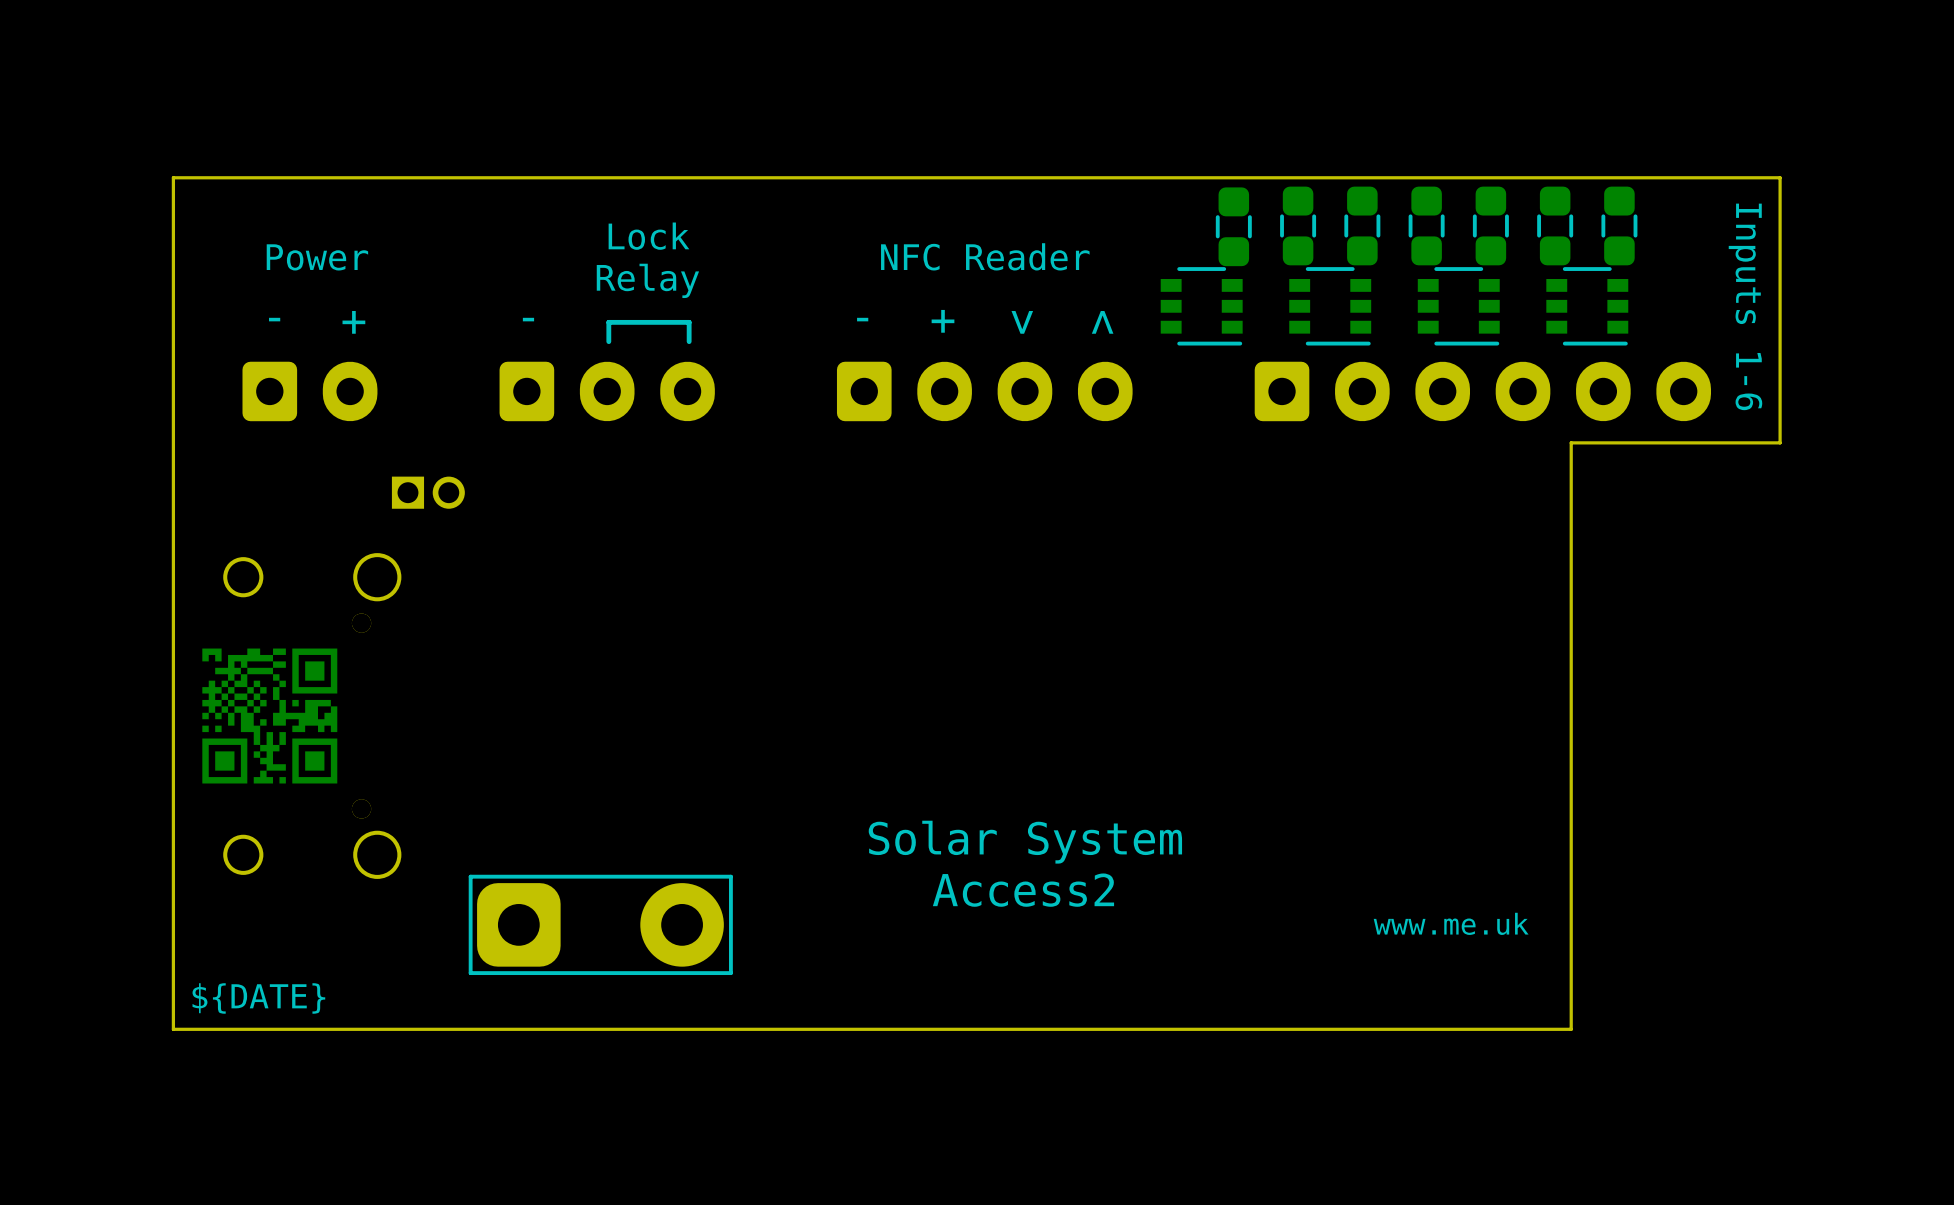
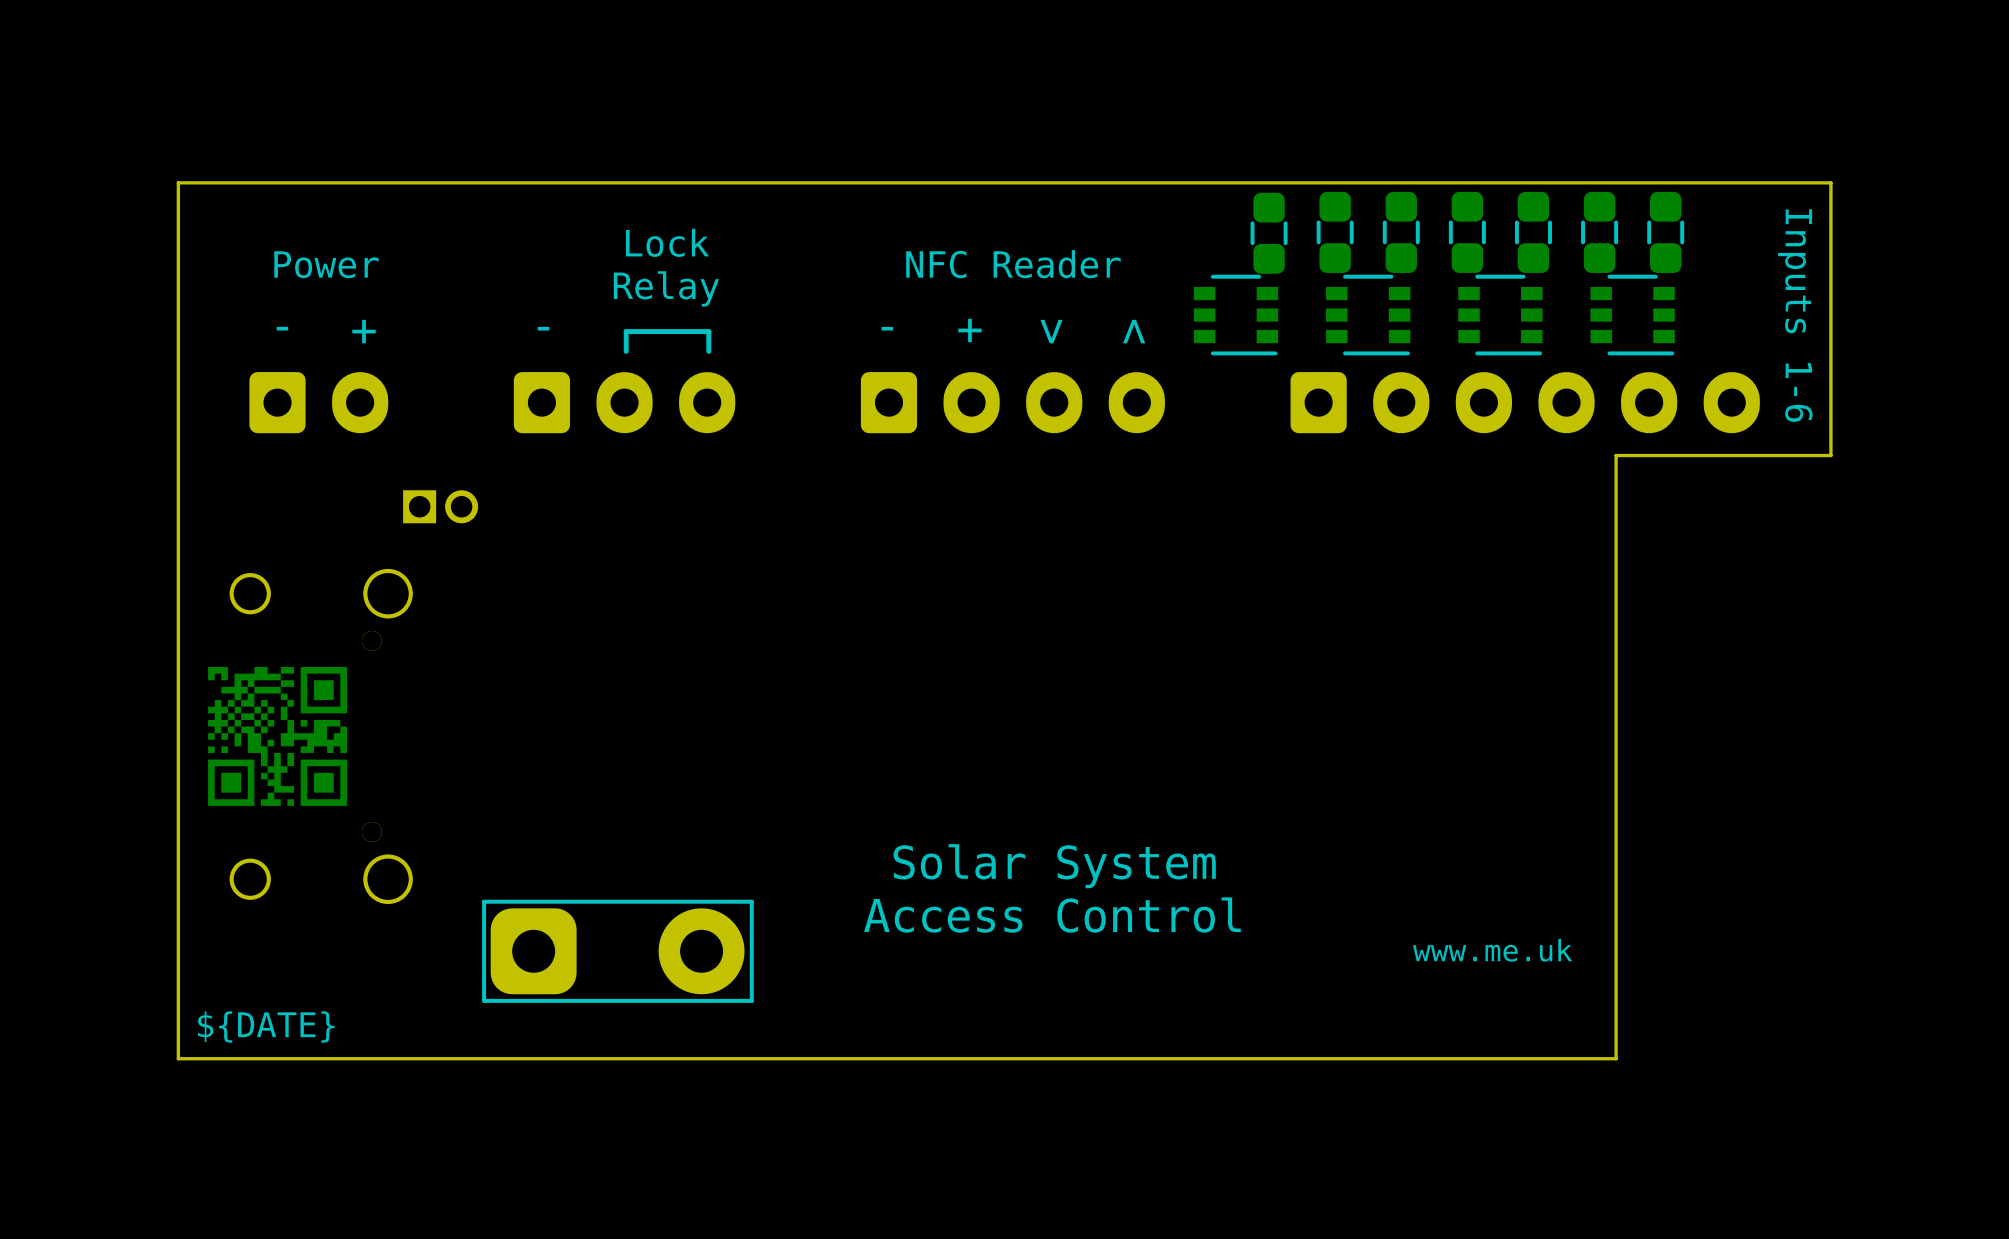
text: Access2 (1023, 890) -> Access Control (1052, 915)

